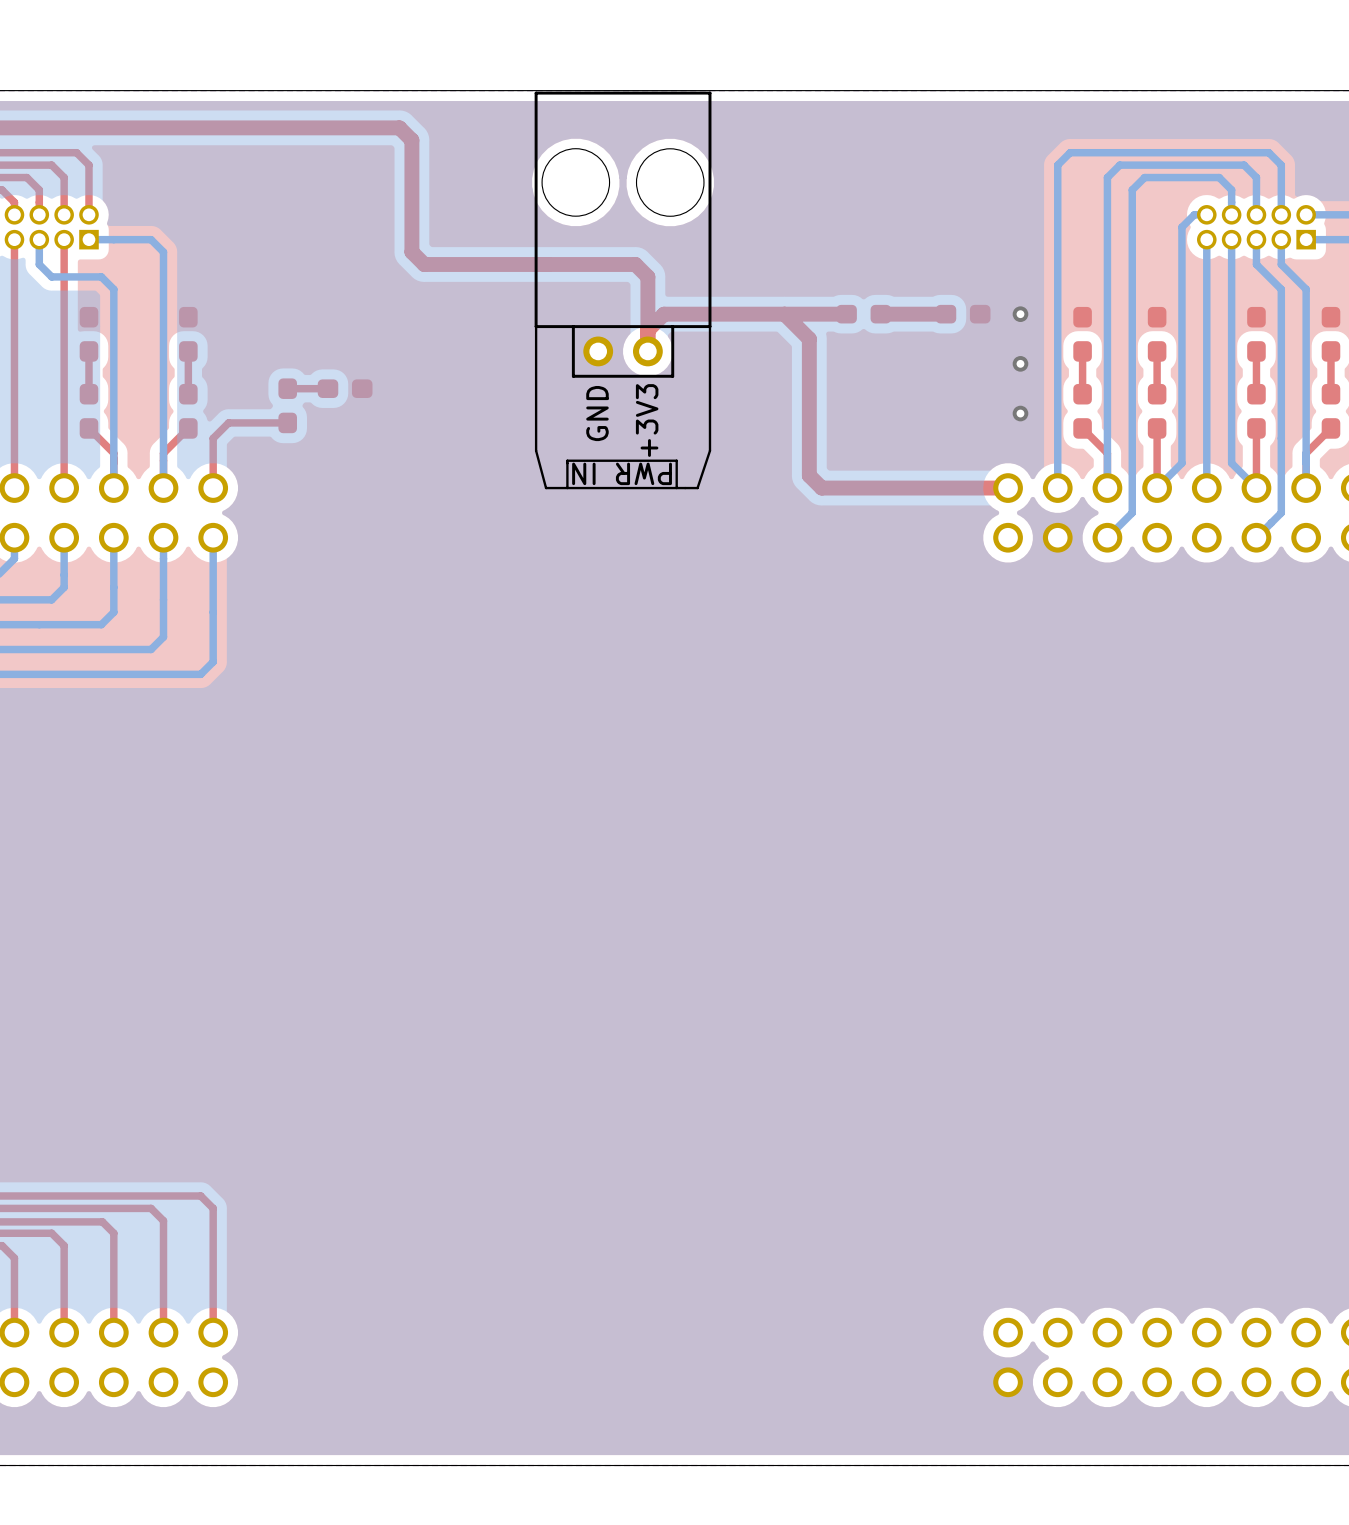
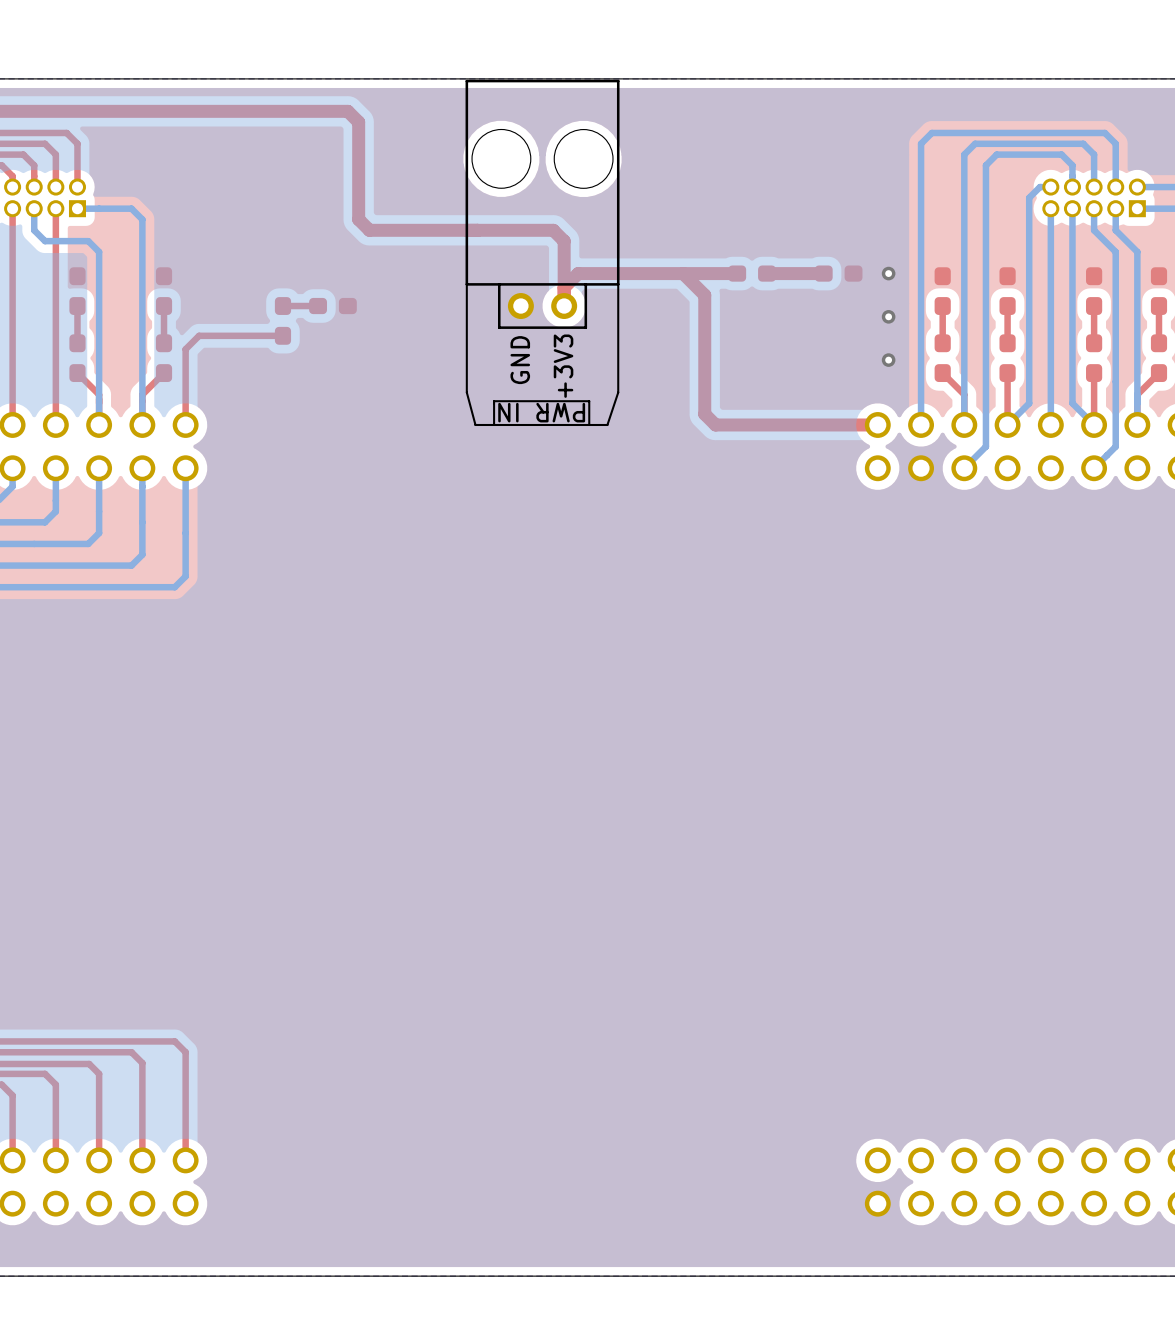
part: none -> (332, 306)
part: none -> (282, 320)
top track: (328, 388) (287, 388) -> (318, 306) (282, 306)
part: (345, 388) -> none
part: (287, 405) -> none
top track: (287, 422) (228, 422) (213, 438) -> (282, 335) (199, 335) (185, 349) (185, 381)

